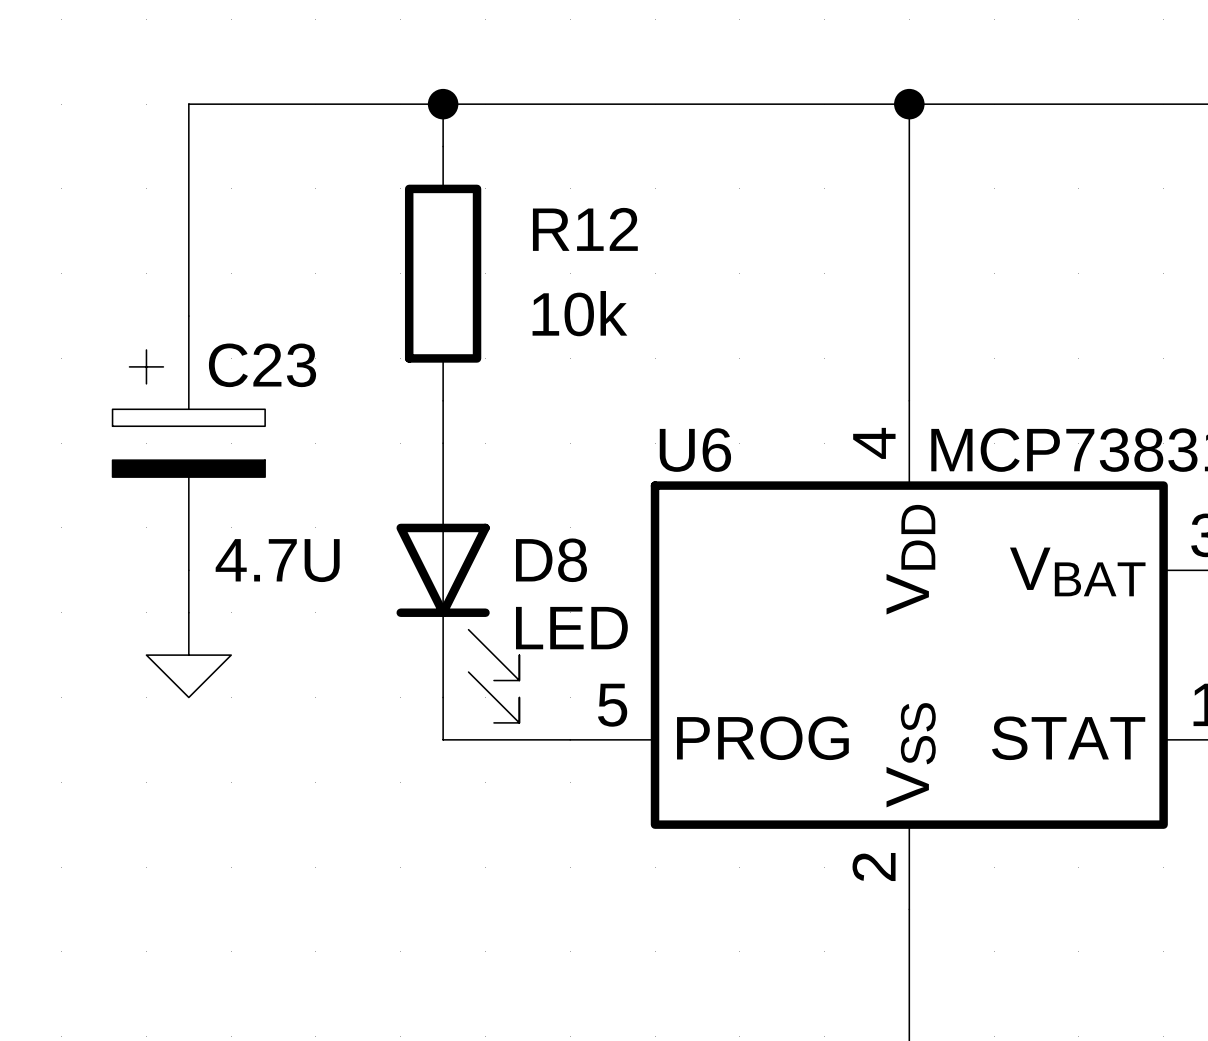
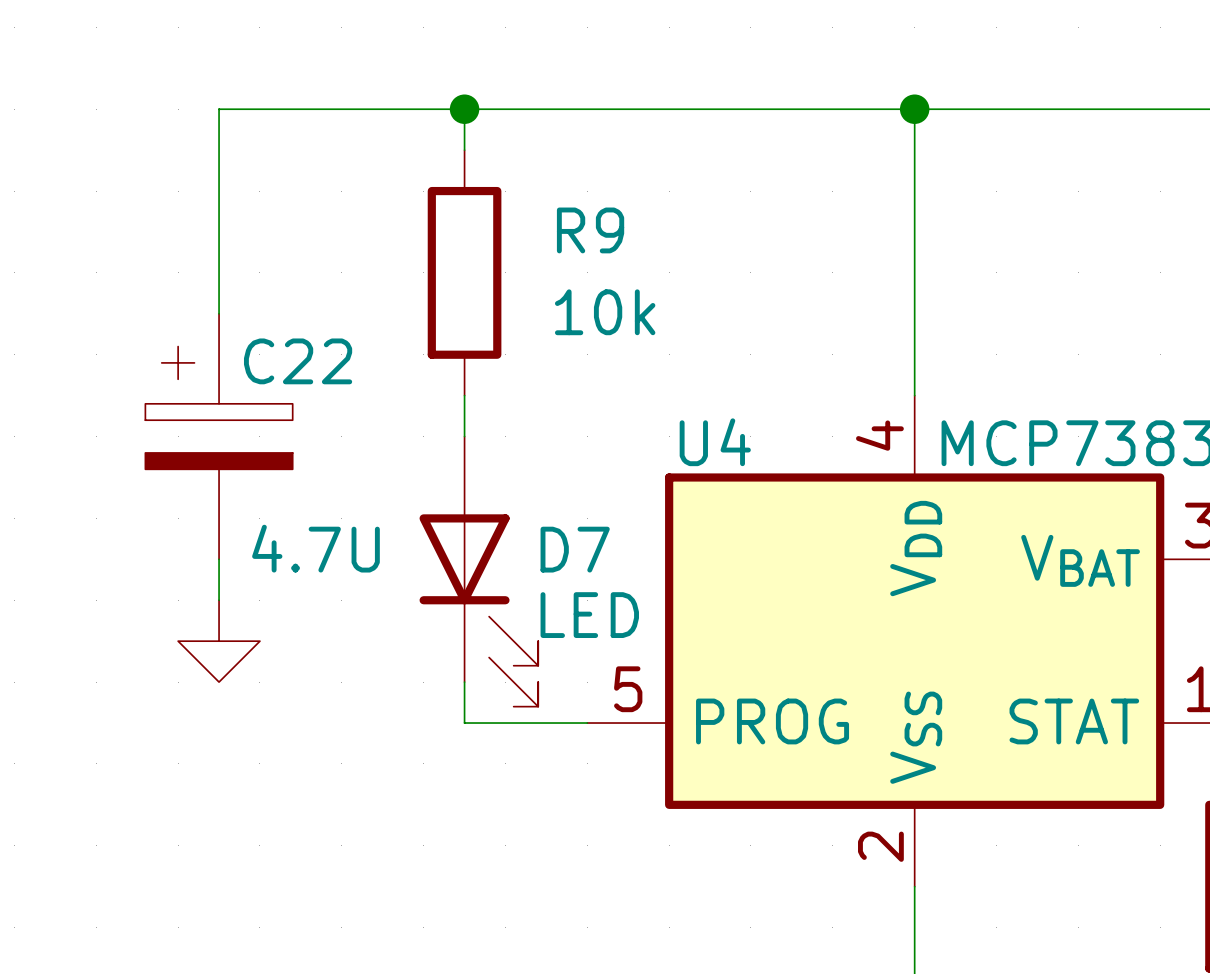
R12 name: R12 (585, 229) -> R9 (590, 230)
C23 name: C23 (262, 365) -> C22 (298, 361)
U6 name: U6 (695, 450) -> U4 (715, 442)
D8 name: D8 (551, 560) -> D7 (575, 549)

